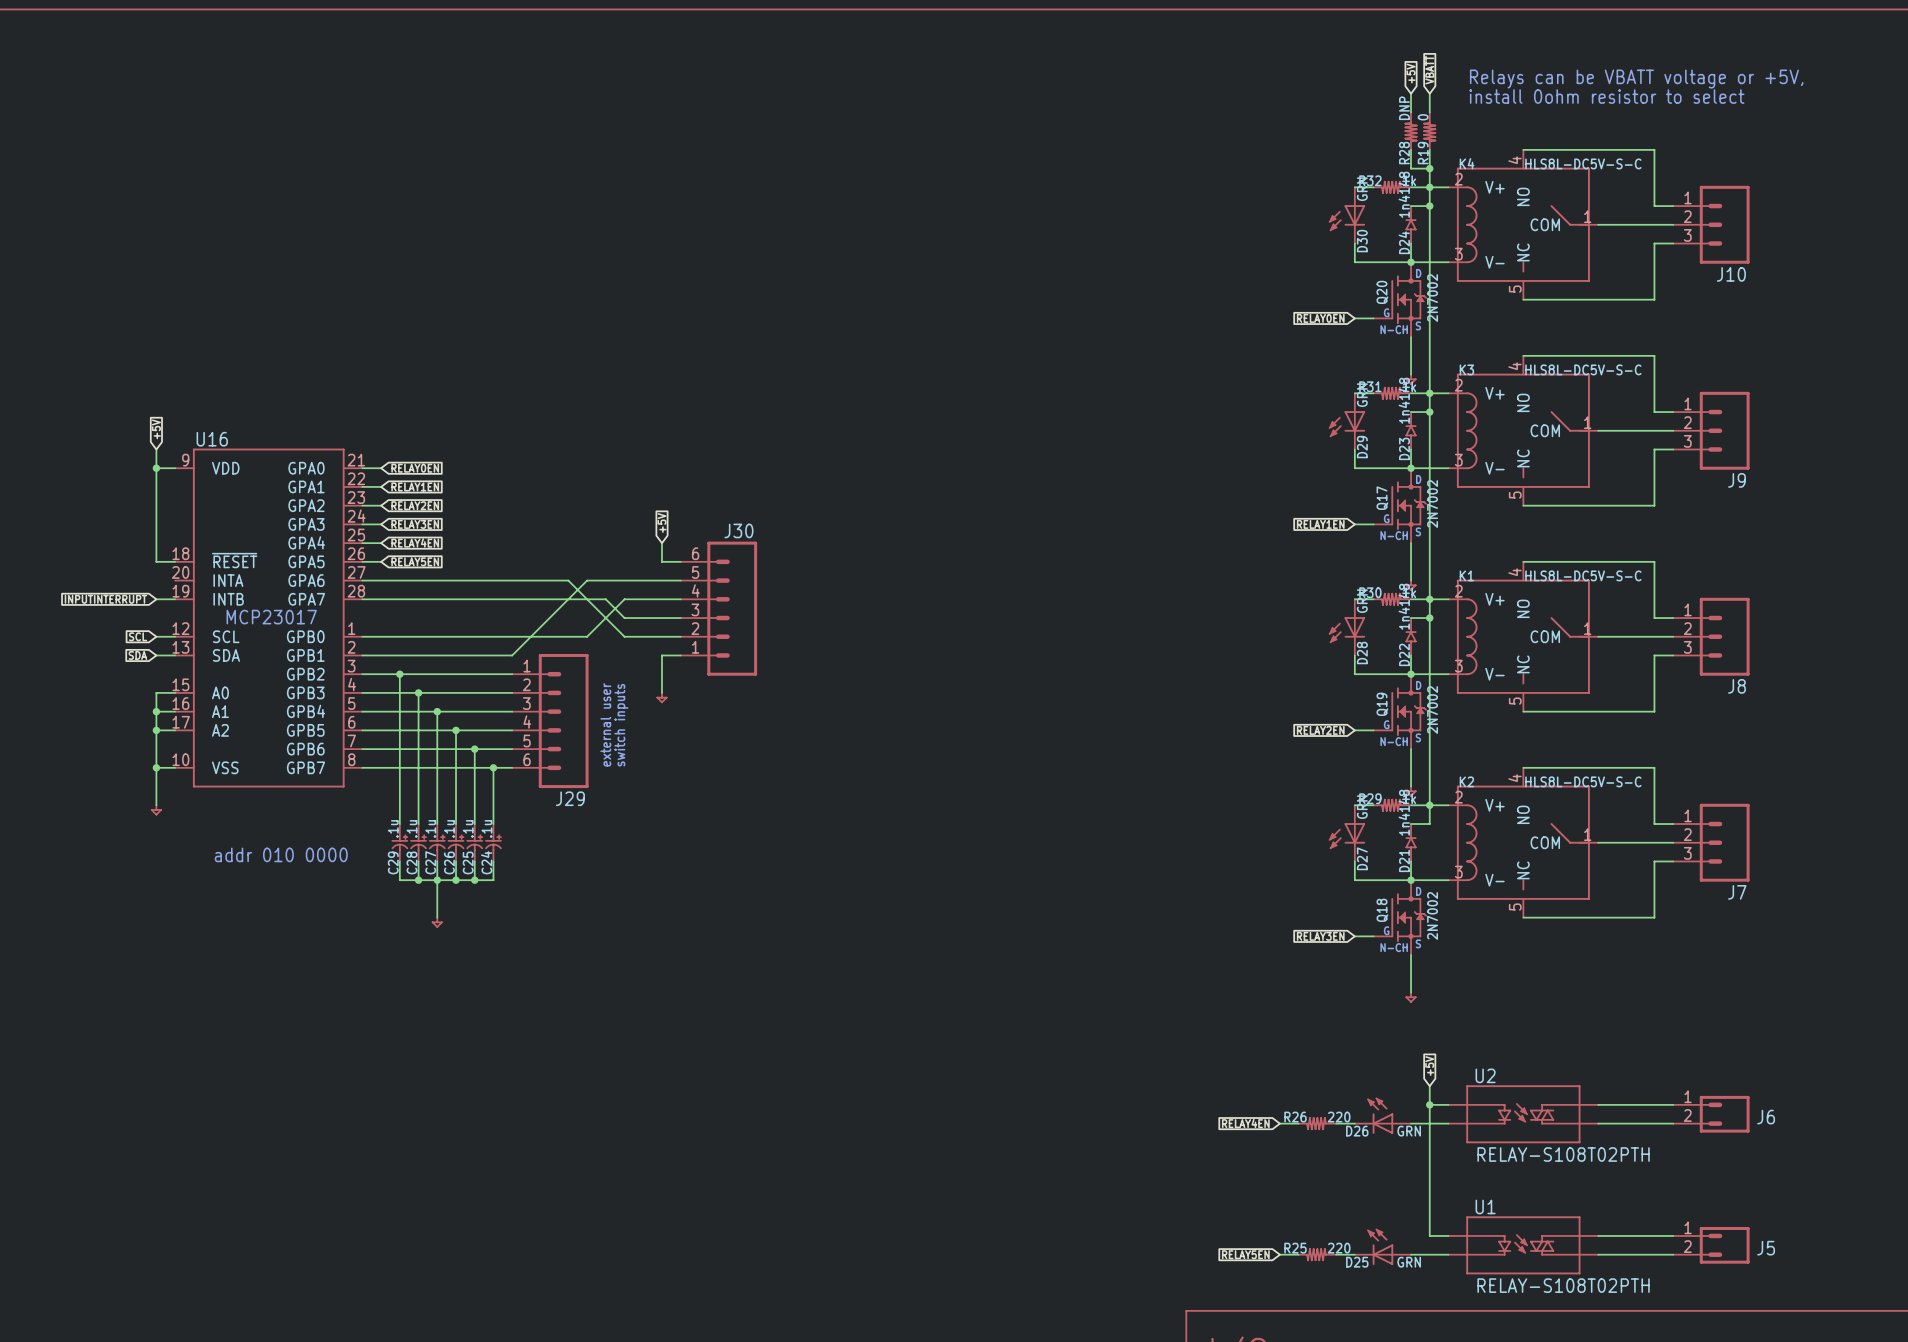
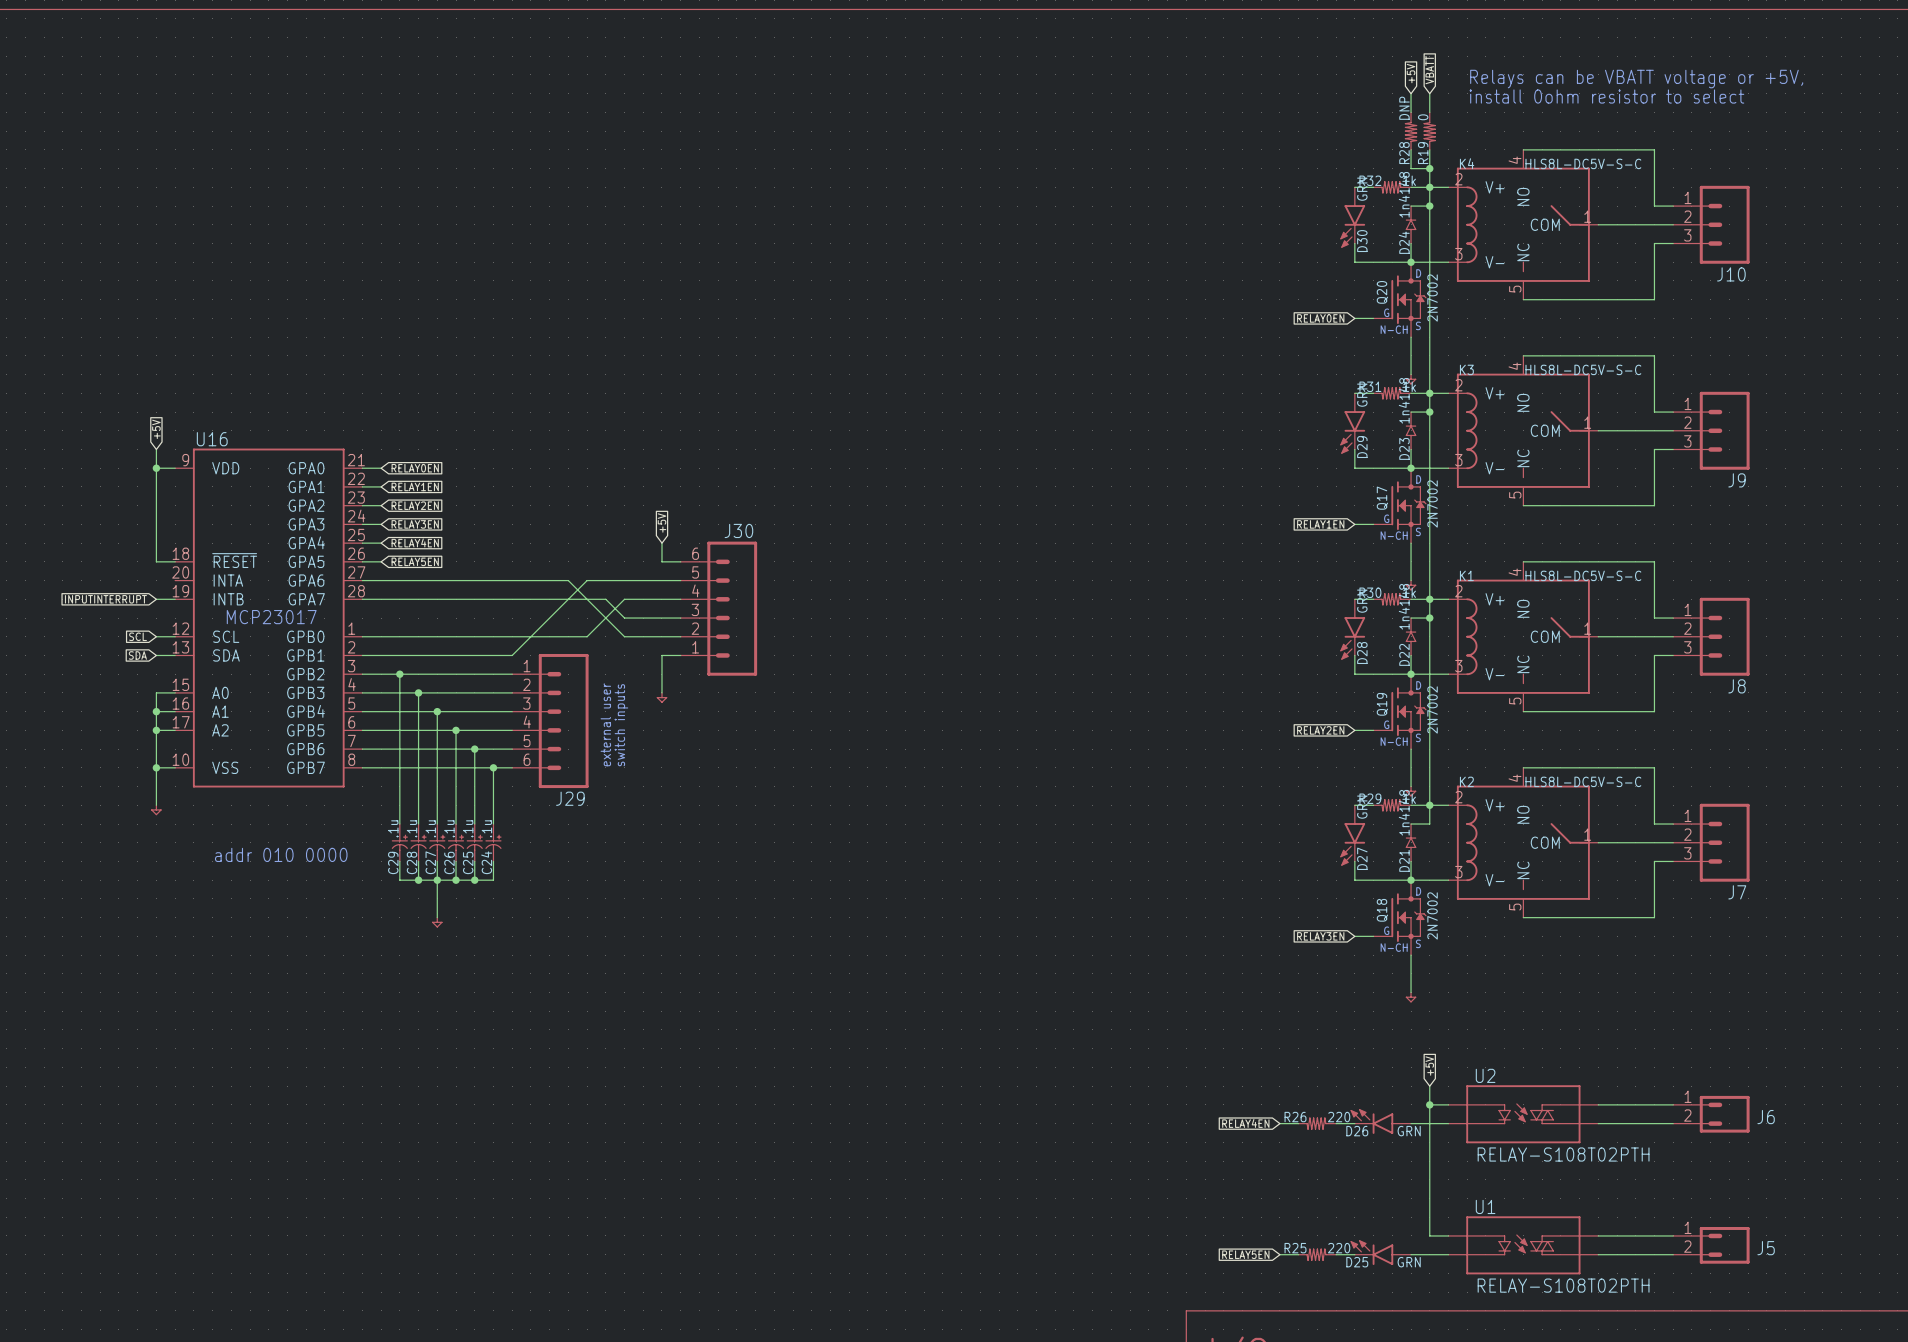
D30 symbol: [1329, 187, 1366, 244] -> [1340, 187, 1366, 248]
D29 symbol: [1329, 393, 1366, 450] -> [1340, 393, 1366, 454]
D28 symbol: [1329, 599, 1366, 656] -> [1340, 599, 1366, 660]
D27 symbol: [1329, 805, 1366, 862] -> [1340, 805, 1366, 866]
D26 symbol: [1354, 1097, 1412, 1134] -> [1350, 1109, 1412, 1134]
D25 symbol: [1354, 1228, 1412, 1266] -> [1350, 1240, 1412, 1266]

